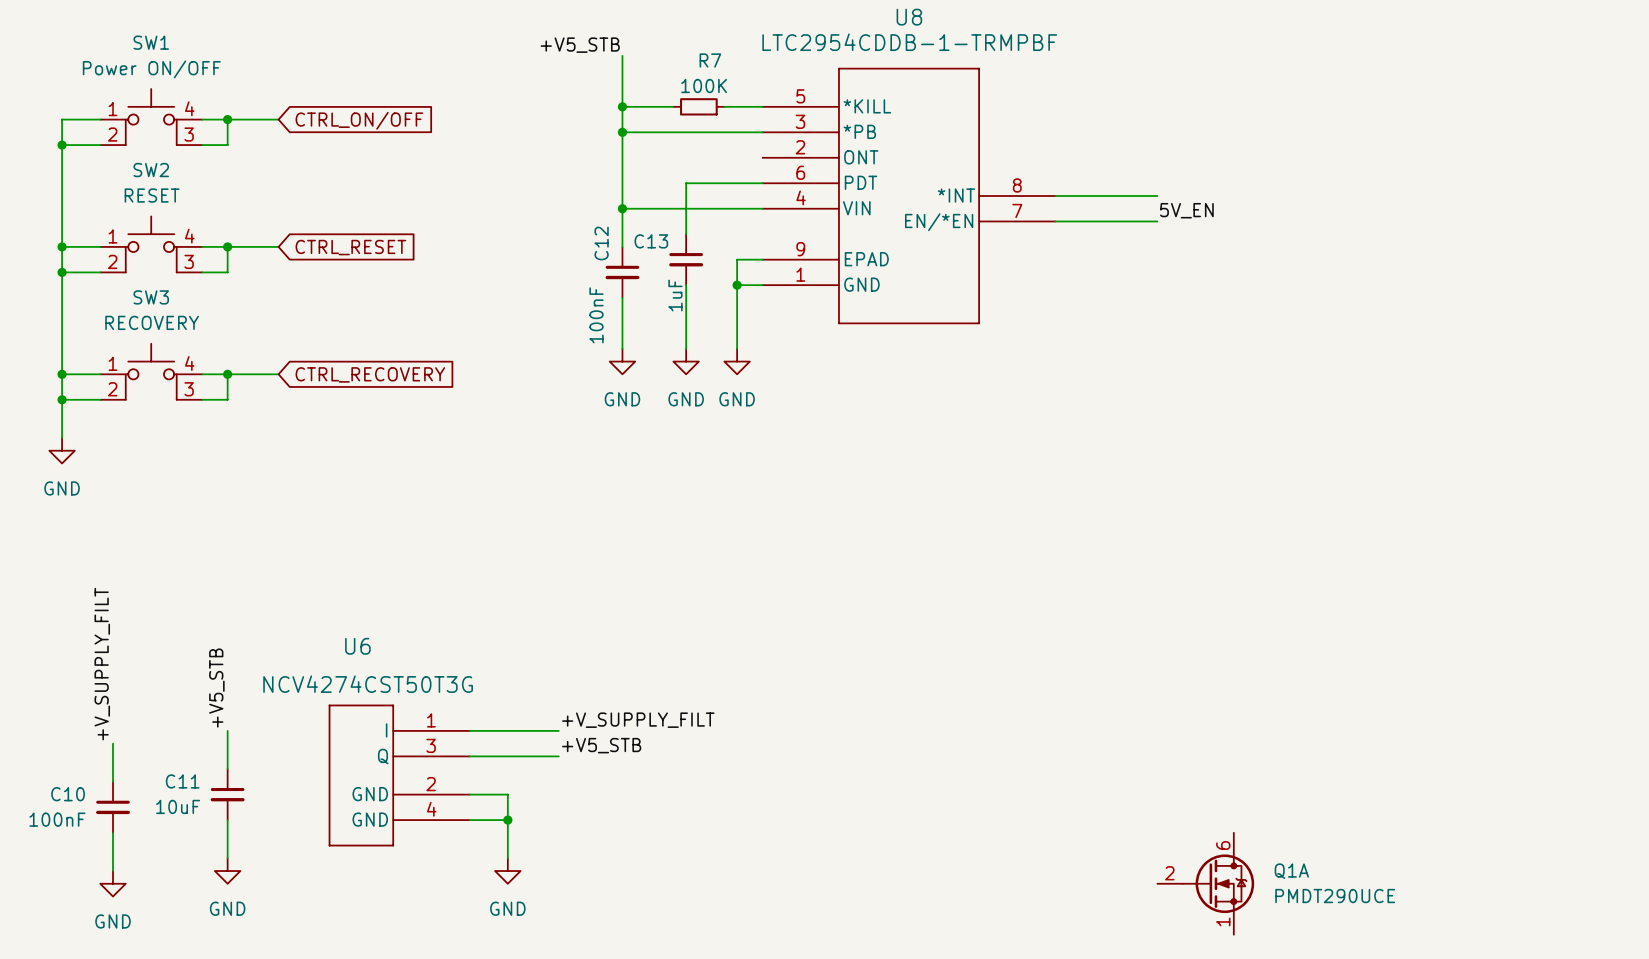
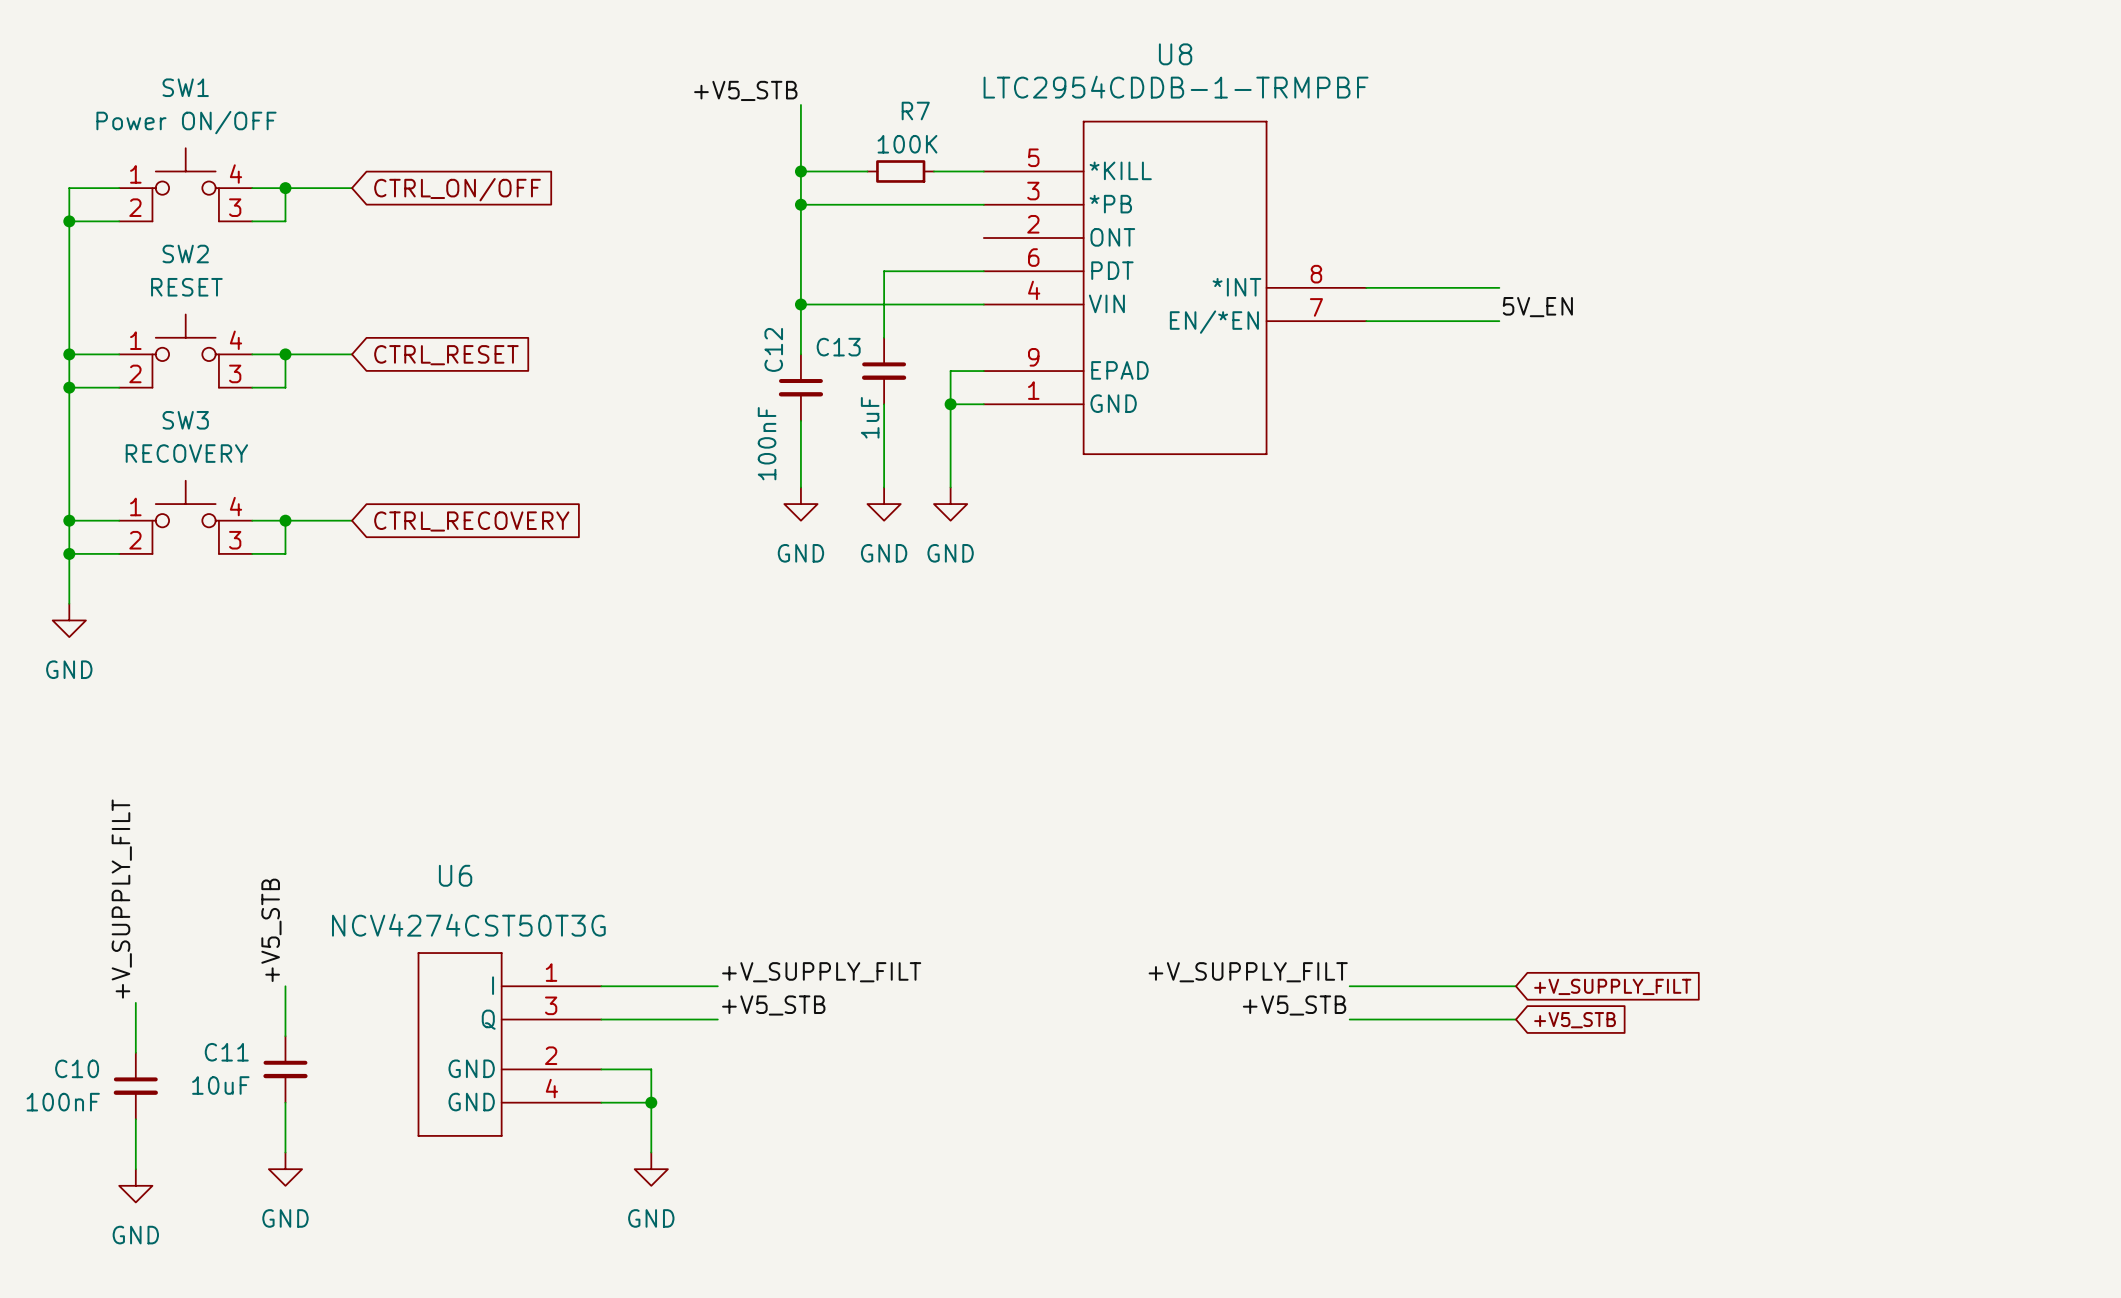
label: none -> +V_SUPPLY_FILT (1248, 972)
wire: none -> (1349, 986) (1515, 986)
global label: none -> +V_SUPPLY_FILT (1612, 986)
label: none -> +V5_STB (1294, 1005)
wire: none -> (1349, 1019) (1515, 1019)
global label: none -> +V5_STB (1575, 1020)
Q1A: PMDT290UCE (1205, 883) -> none

